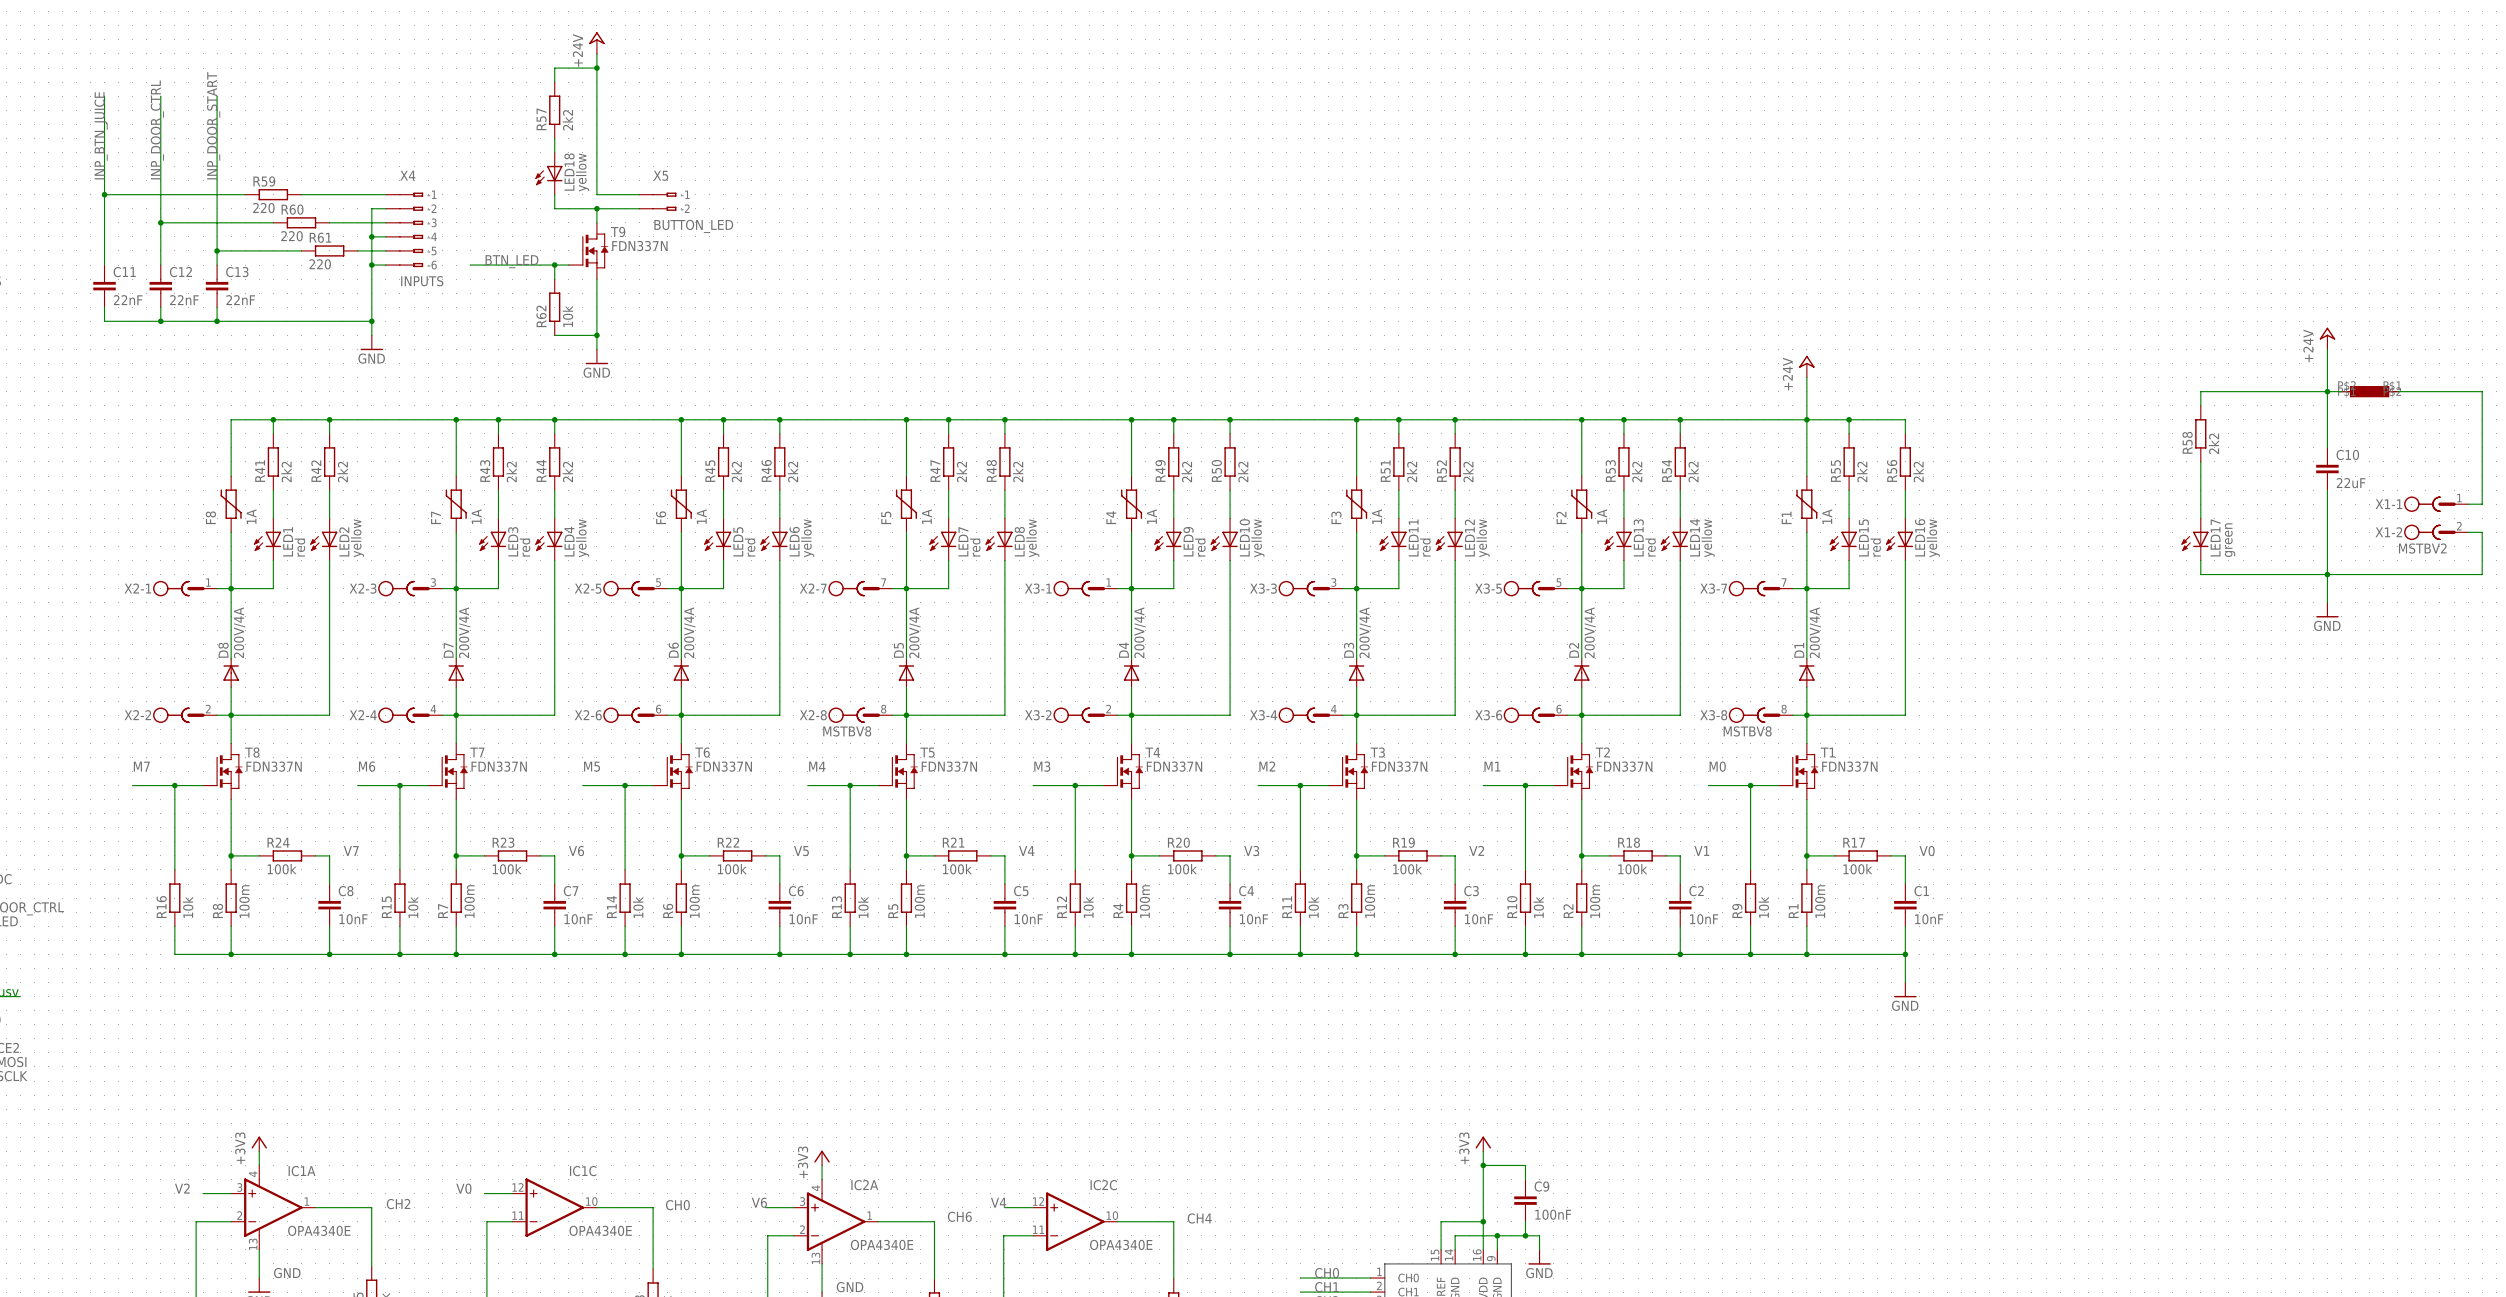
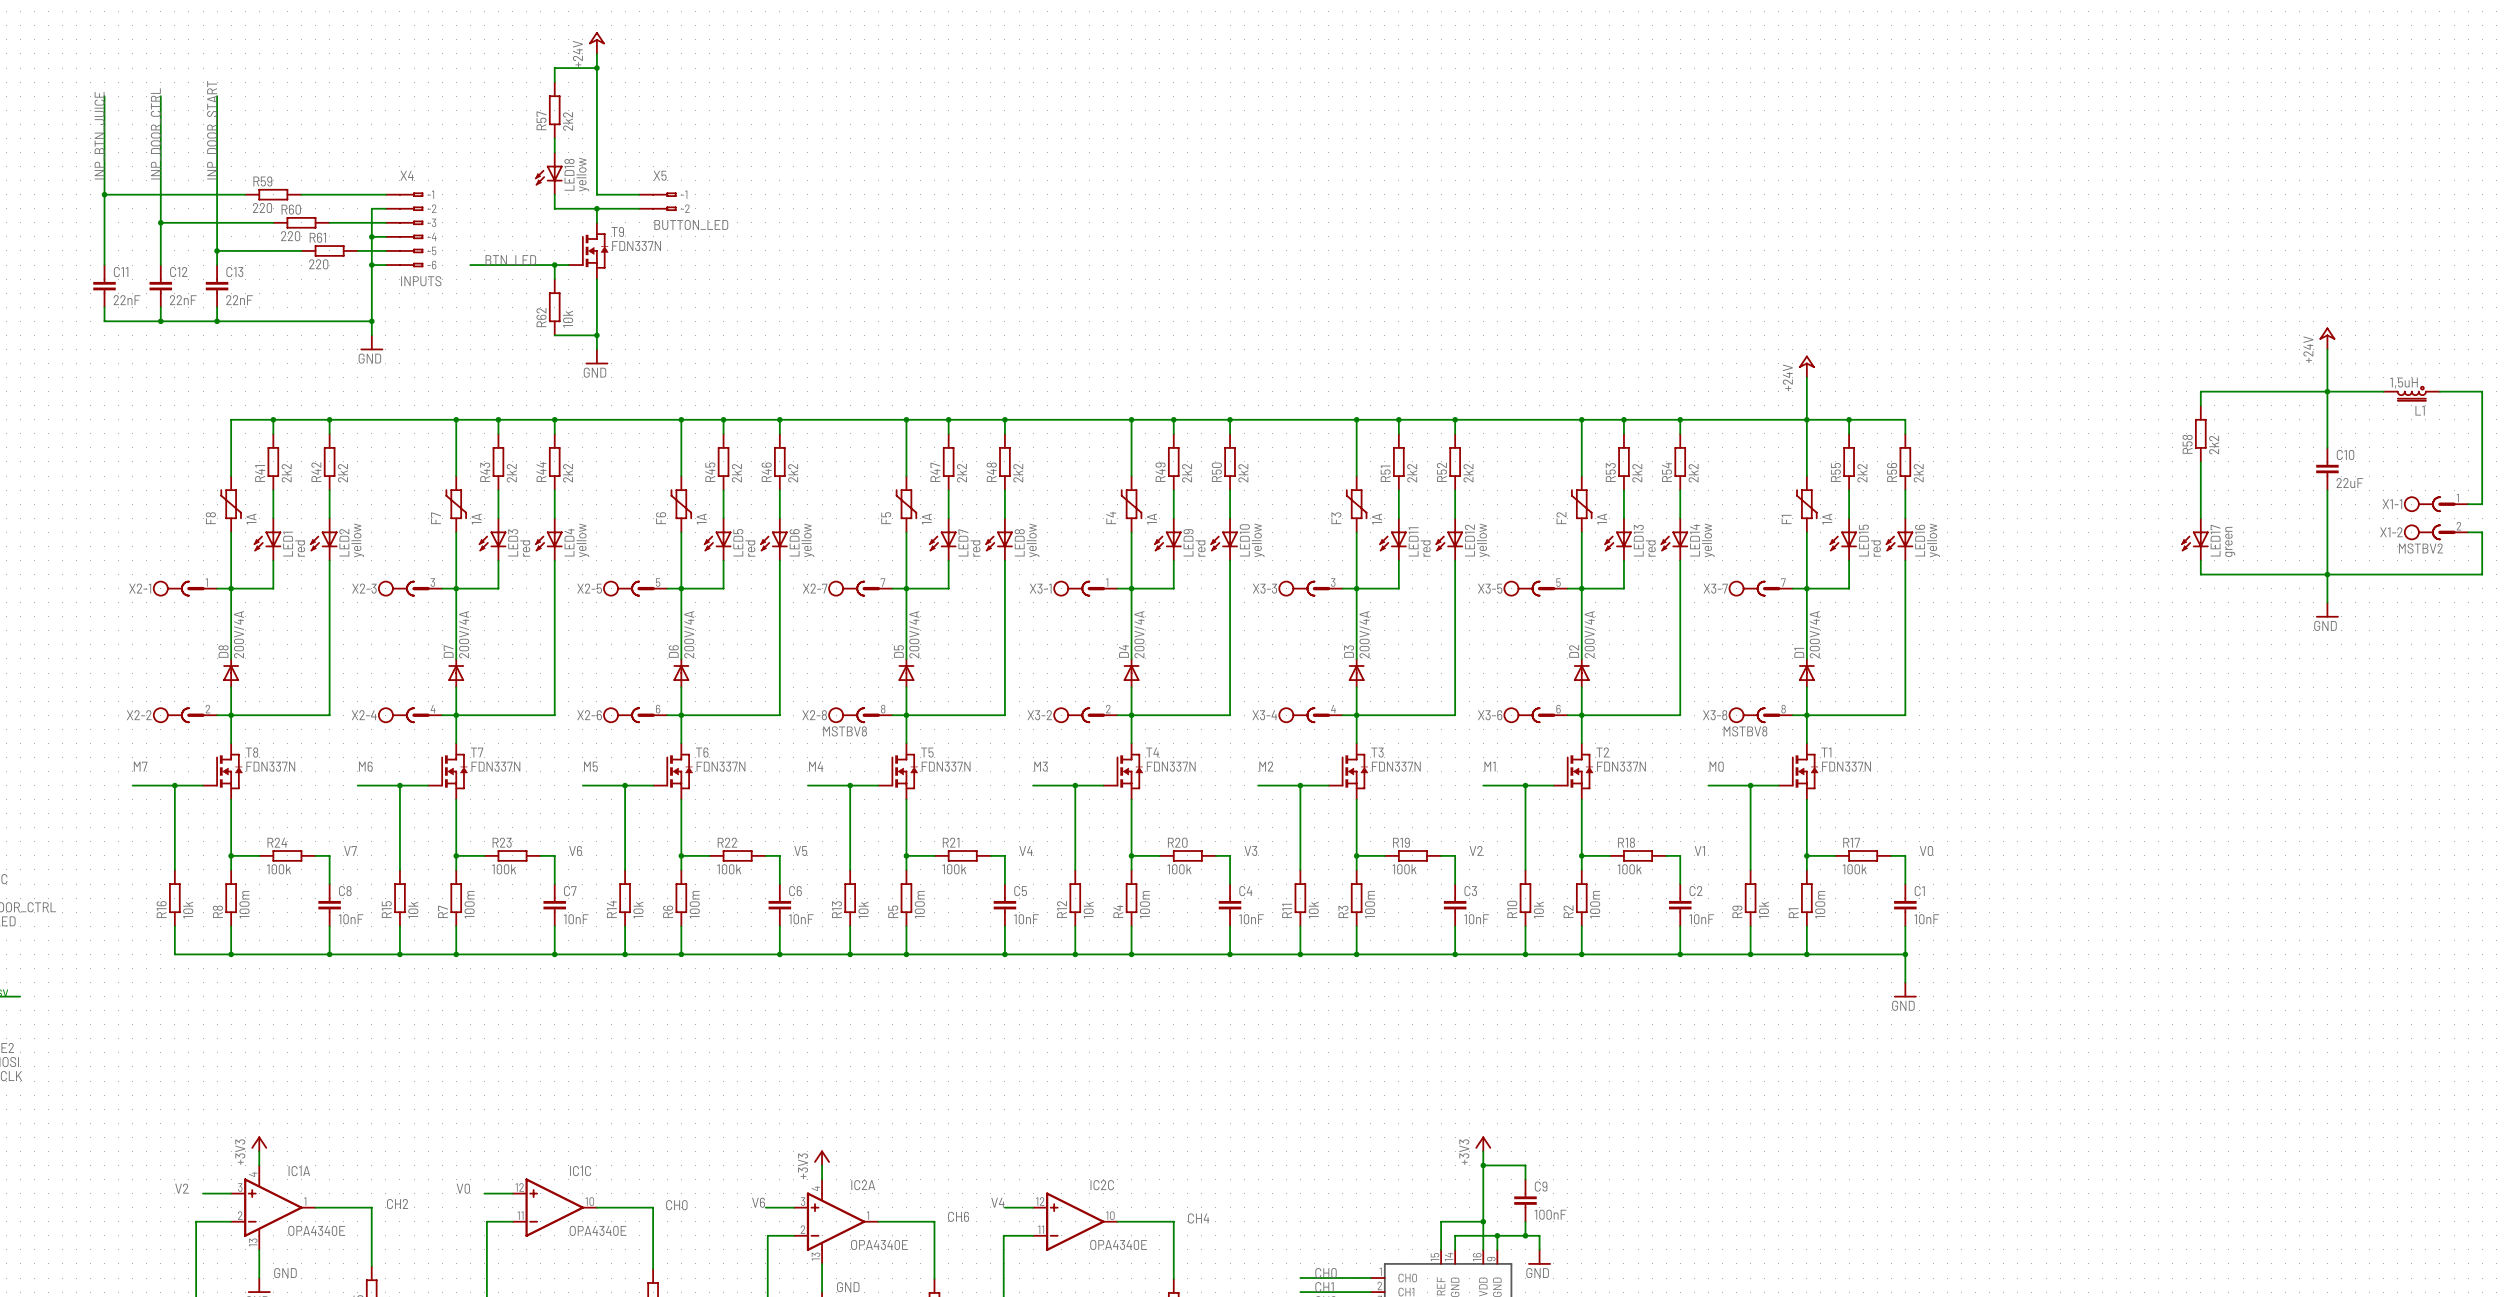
part: (2369, 391) -> none
L1: none -> 1,5uH (2411, 393)

